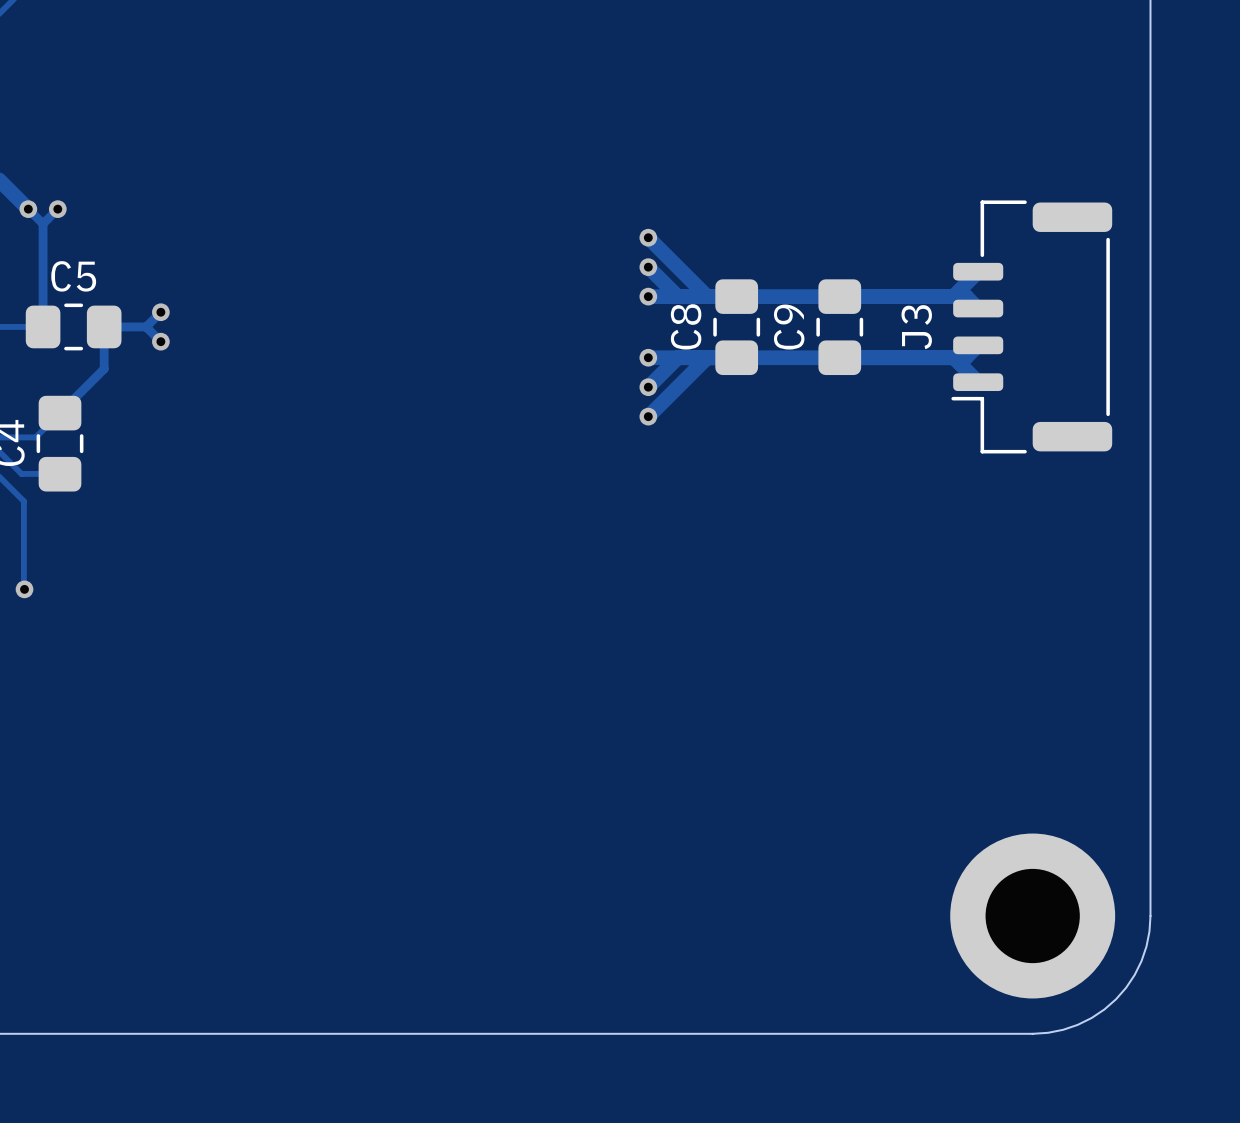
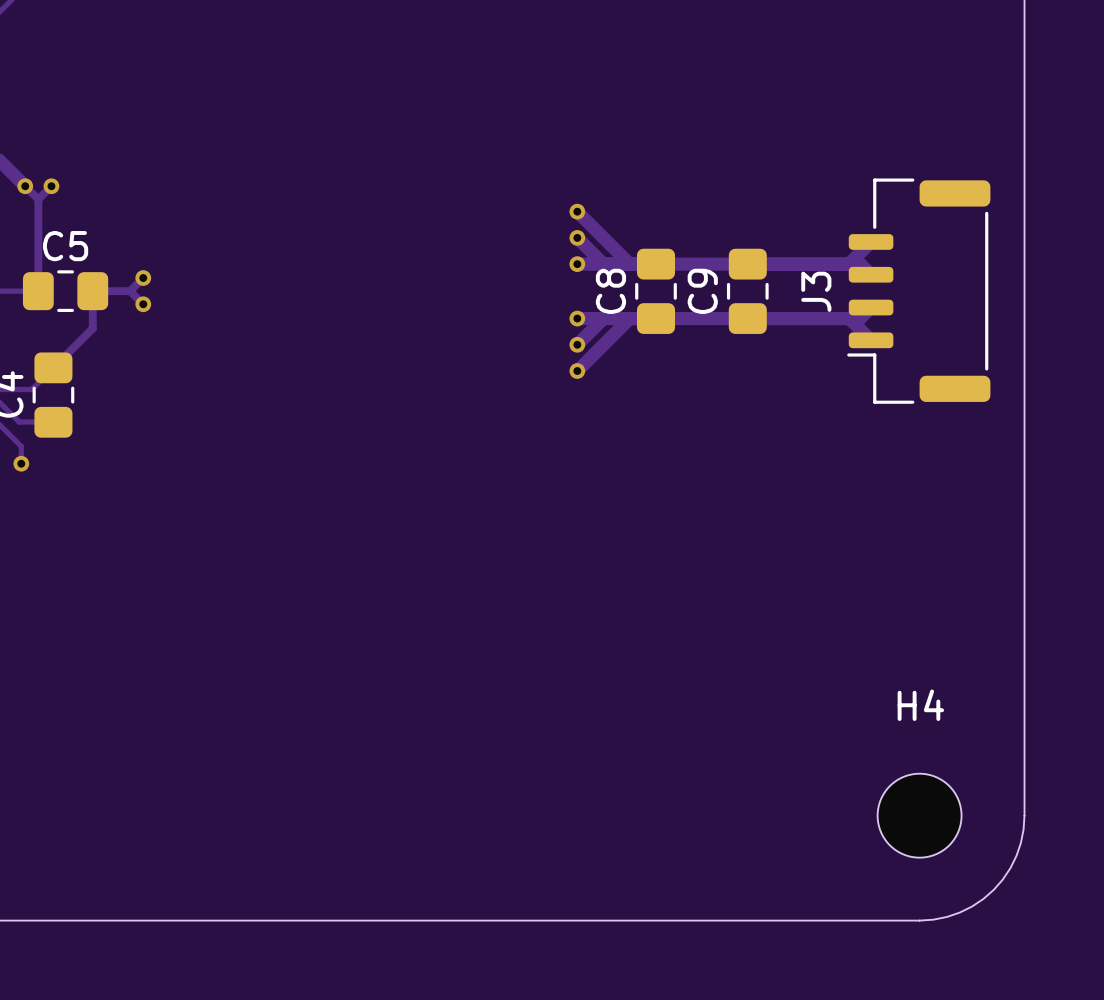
track: (23, 520) (24, 589) -> none
via position: (24, 589) -> (21, 463)
part: (1032, 916) -> none
H4: none -> (919, 815)

